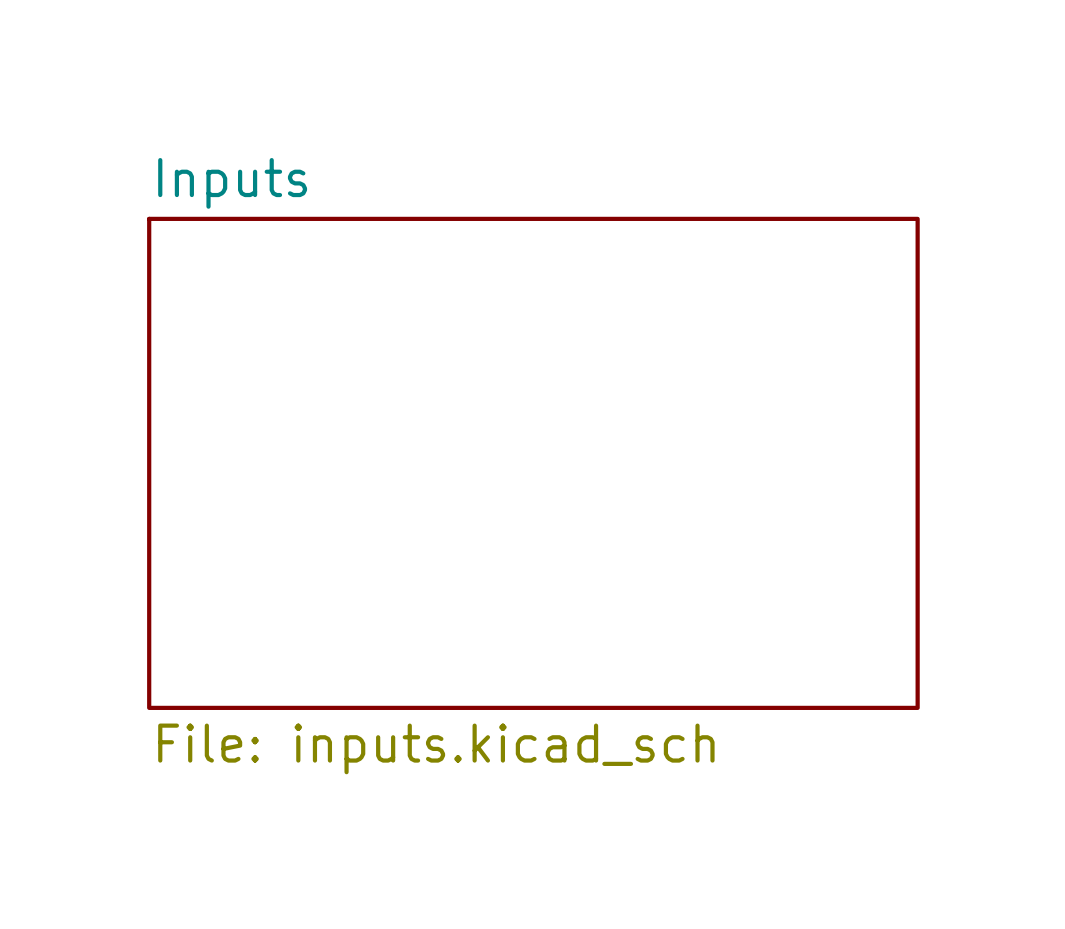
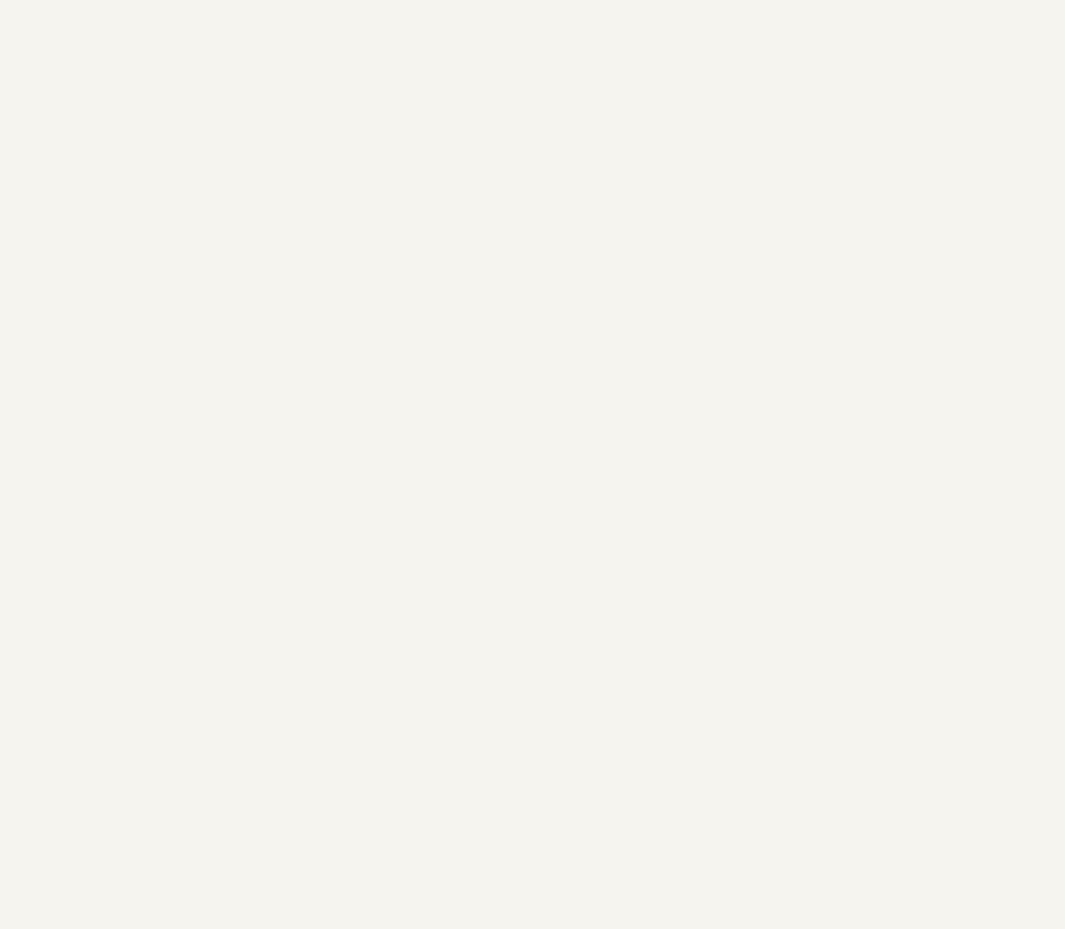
sheet Inputs: File: inputs.kicad_sch (533, 463) -> none

